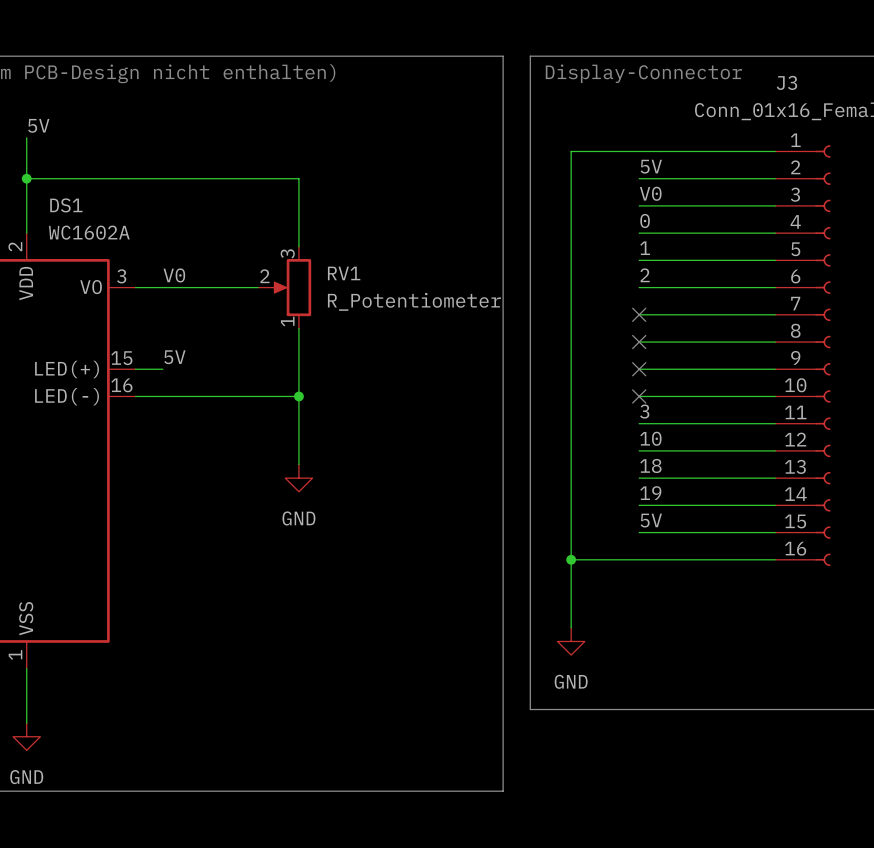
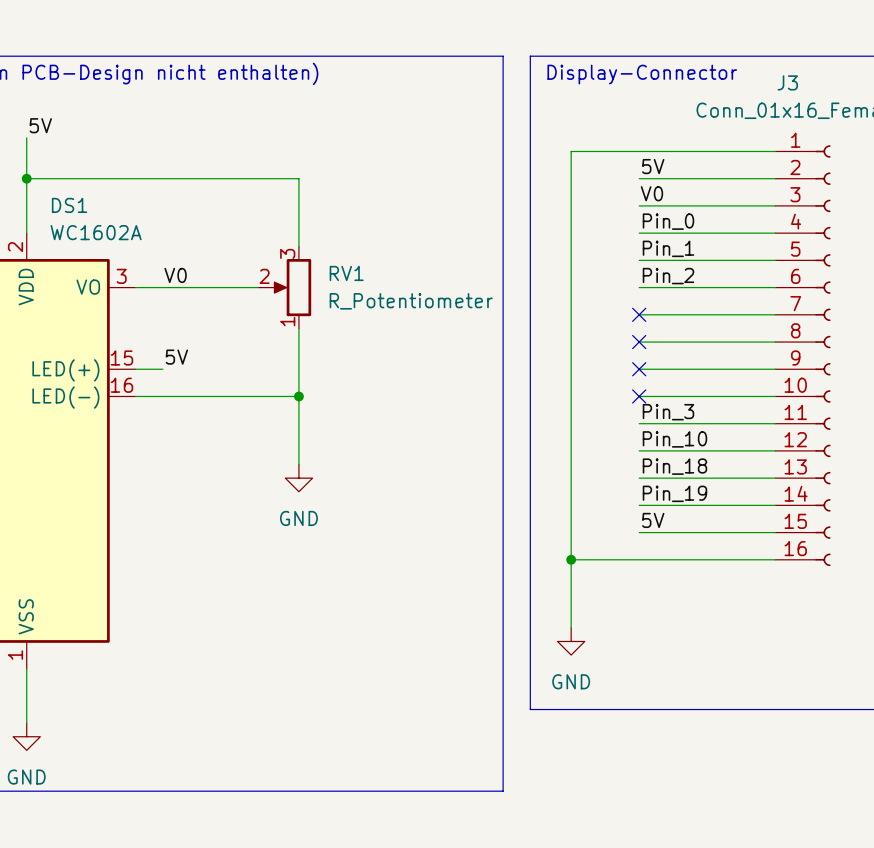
label: 0 (645, 220) -> Pin_0 (668, 221)
label: 1 (645, 248) -> Pin_1 (668, 248)
label: 2 (645, 275) -> Pin_2 (668, 276)
label: 3 (644, 411) -> Pin_3 (668, 412)
label: 10 (650, 438) -> Pin_10 (674, 439)
label: 18 (650, 465) -> Pin_18 (674, 466)
label: 19 (650, 493) -> Pin_19 (674, 493)

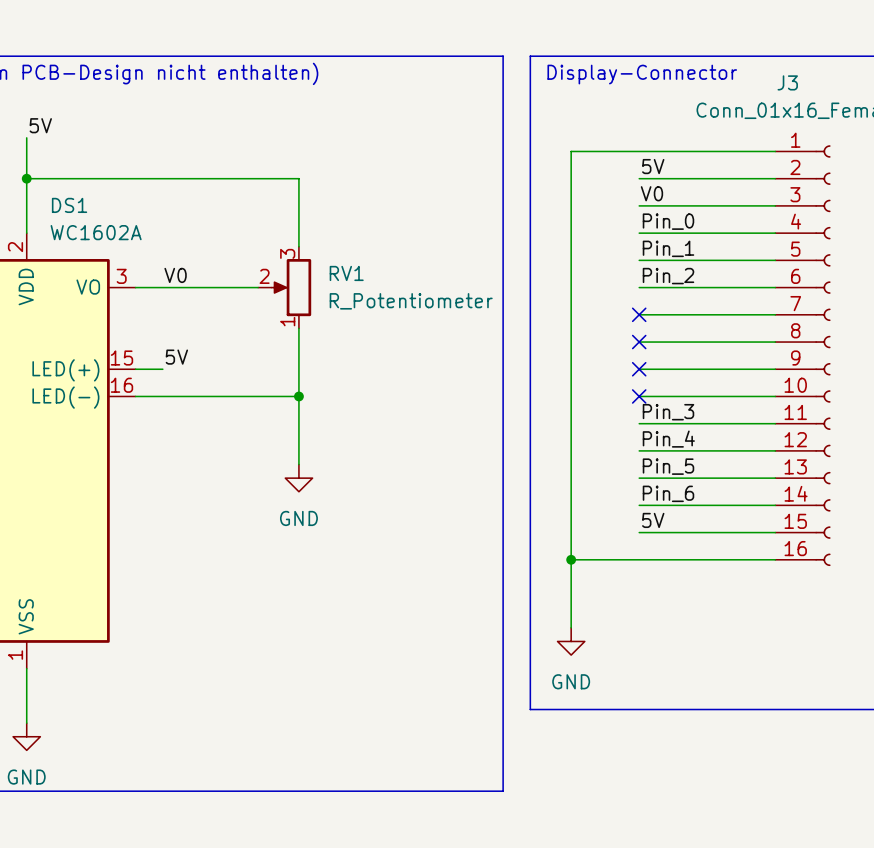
label: Pin_10 (674, 439) -> Pin_4 (668, 439)
label: Pin_18 (674, 466) -> Pin_5 (668, 466)
label: Pin_19 (674, 493) -> Pin_6 (668, 493)

